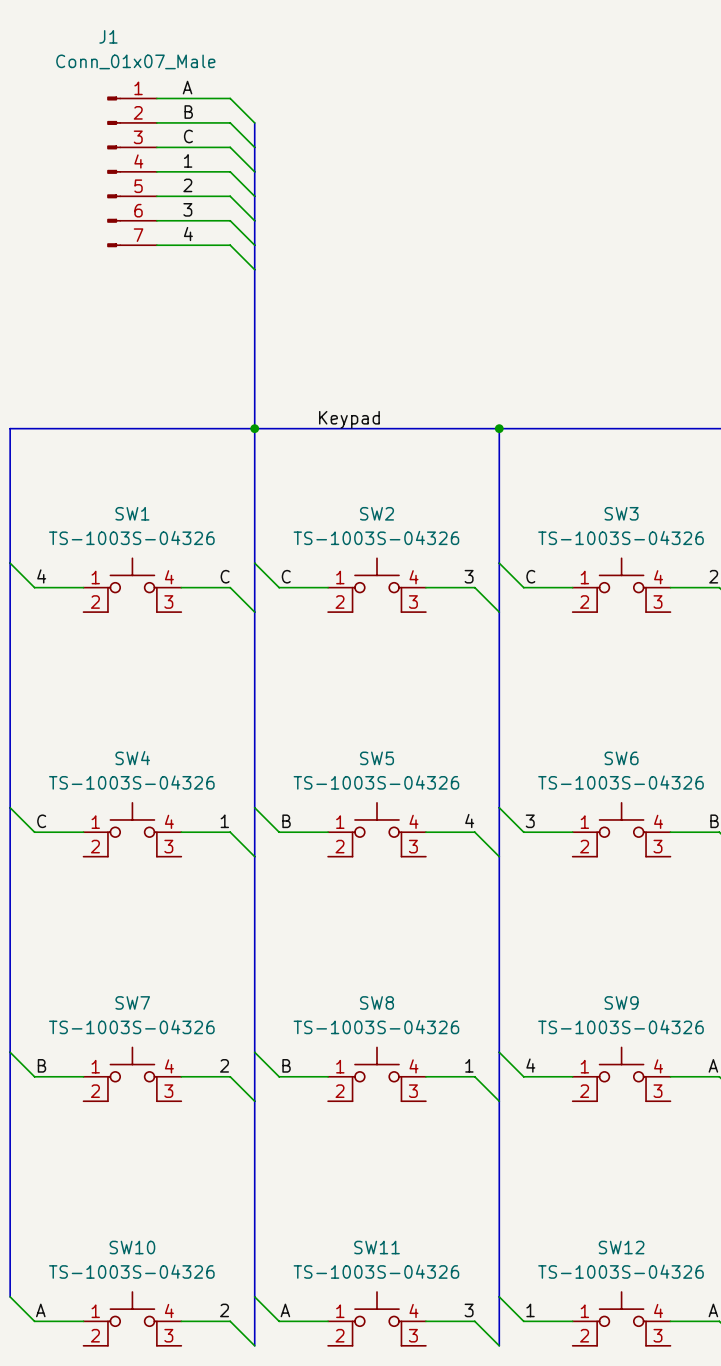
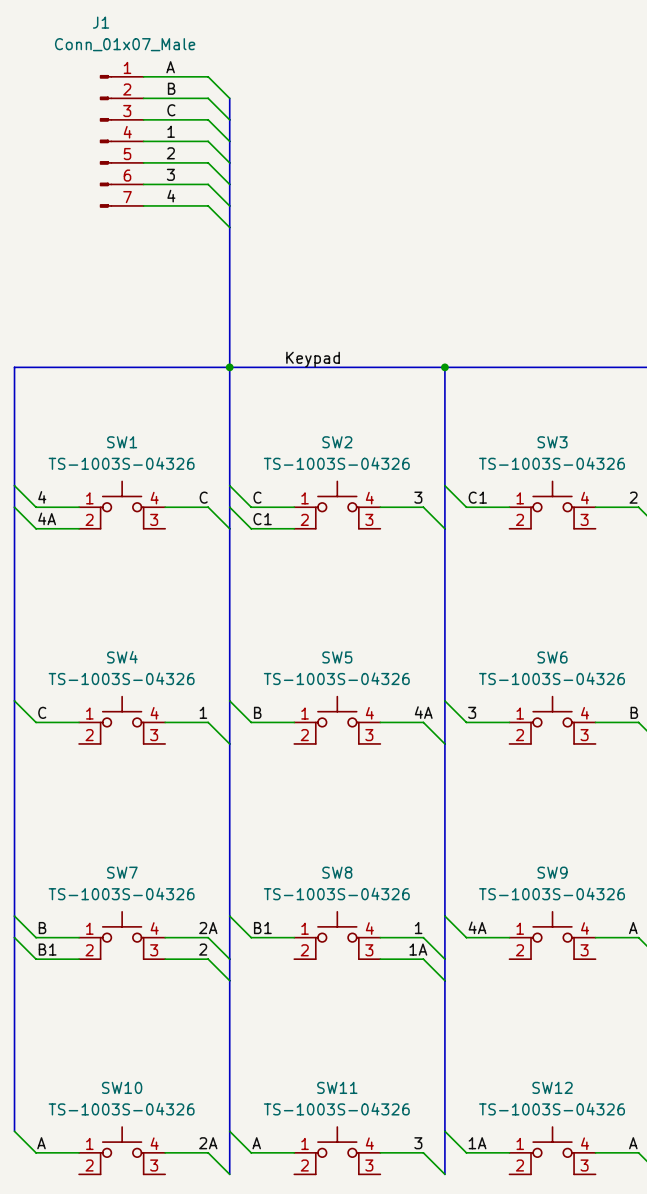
label: C (530, 576) -> C1 (477, 497)
wire: none -> (14, 507) (36, 528) (79, 528)
wire: none -> (229, 507) (251, 528) (294, 528)
label: none -> 4A (47, 518)
label: none -> C1 (262, 519)
label: 4 (469, 821) -> 4A (423, 712)
label: 2 (224, 1065) -> 2A (208, 928)
label: B (286, 1065) -> B1 (262, 928)
label: 4 (530, 1065) -> 4A (477, 927)
wire: none -> (14, 937) (36, 959) (79, 959)
label: none -> B1 (47, 949)
label: none -> 2 (203, 949)
label: none -> 1A (418, 949)
wire: none -> (165, 959) (208, 959) (229, 980)
wire: none -> (380, 959) (423, 959) (444, 980)
label: 2 (224, 1310) -> 2A (208, 1143)
label: 1 (530, 1310) -> 1A (477, 1143)

